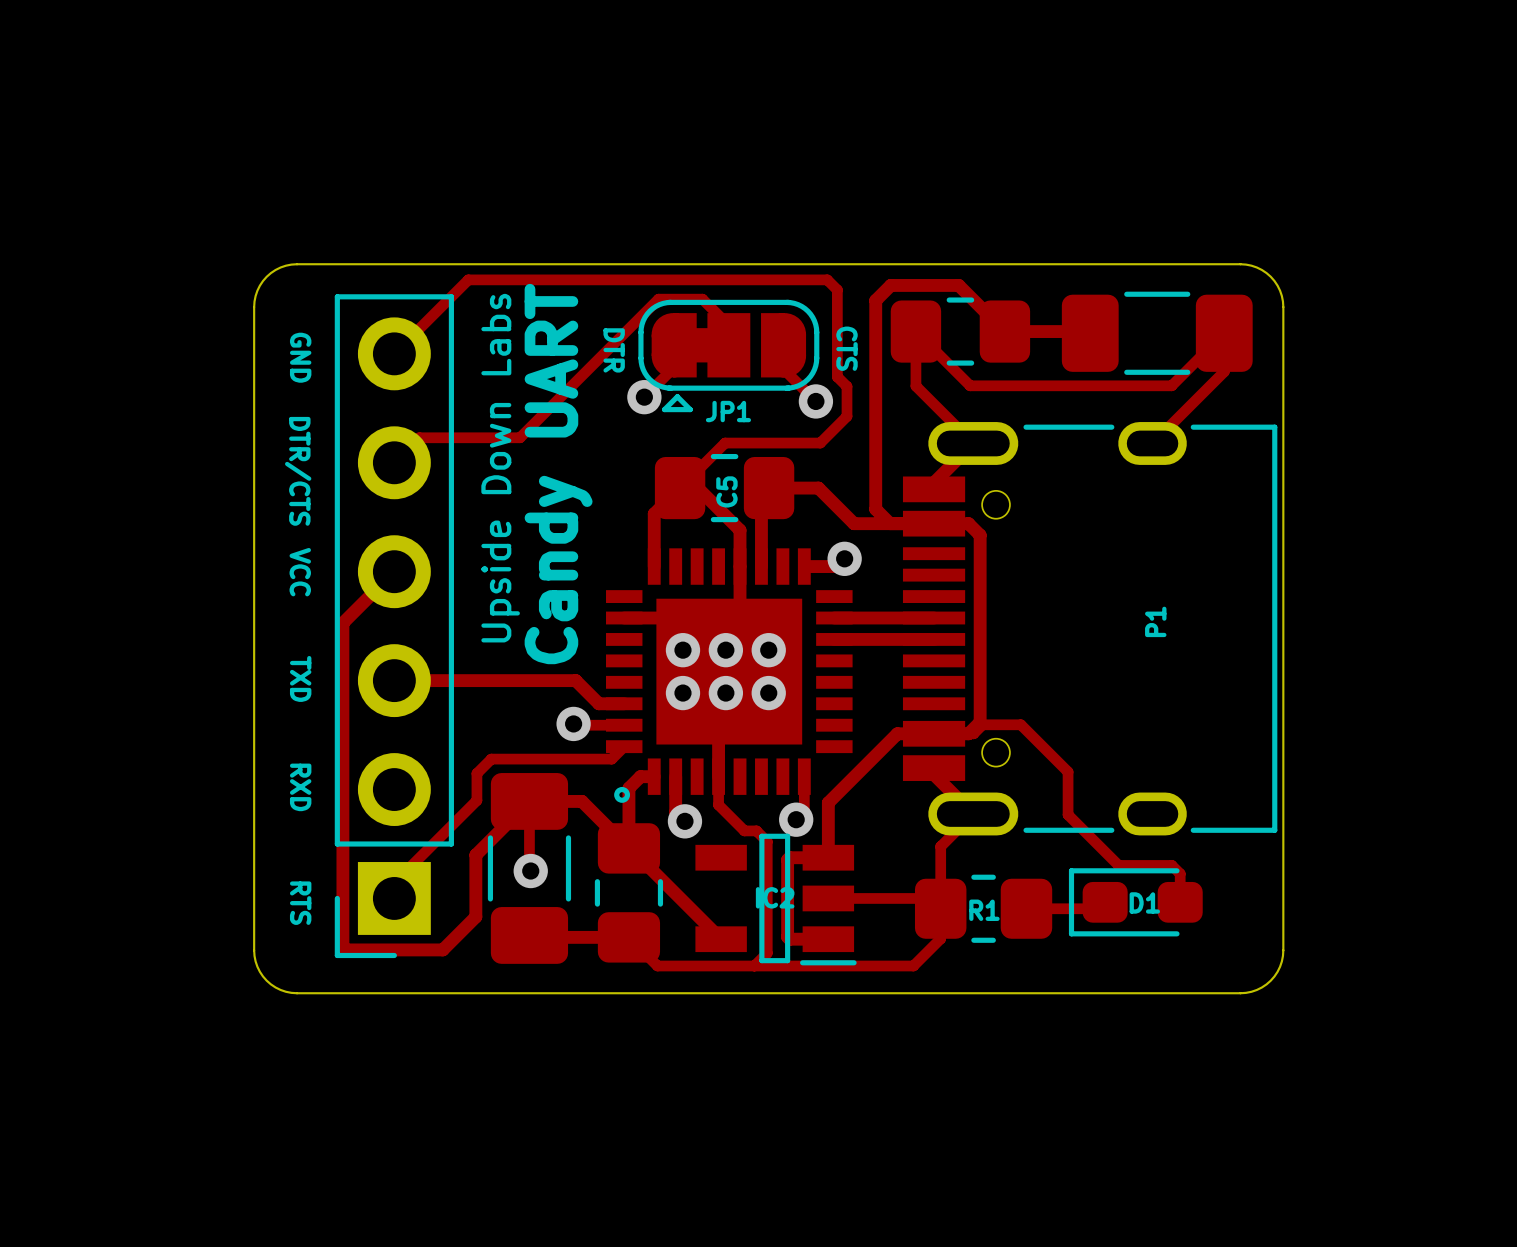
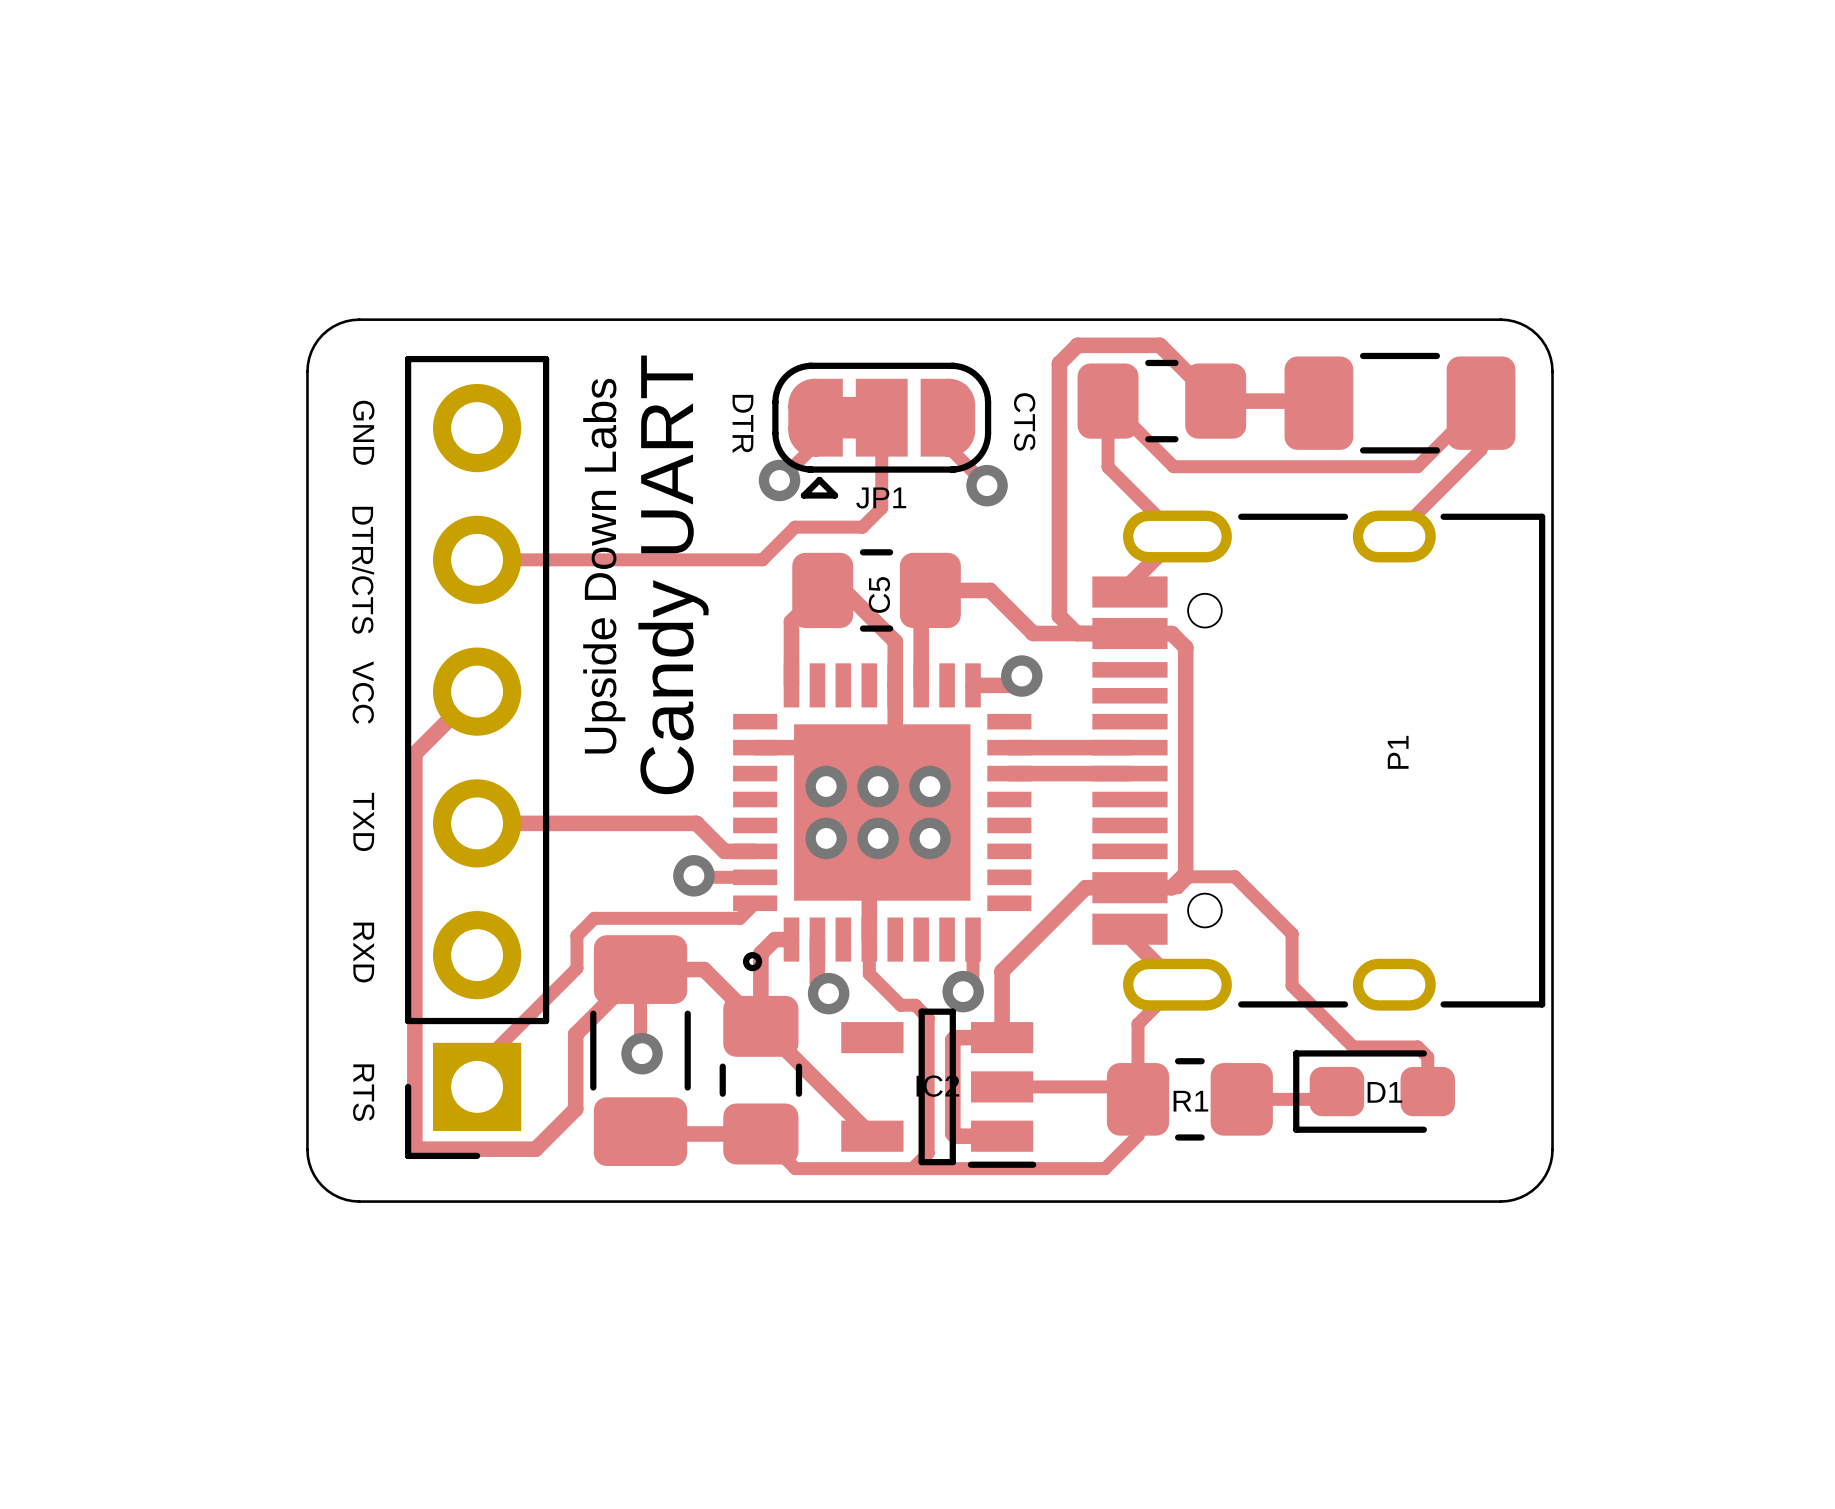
track: (728, 345) (728, 325) (702, 299) (658, 299) (520, 437) (419, 437) (394, 462) -> (881, 417) (881, 507) (862, 527) (795, 527) (762, 559) (477, 559)
track: (394, 353) (468, 279) (827, 279) (837, 289) (837, 376) (847, 386) (847, 416) (820, 443) (725, 443) (680, 488) -> none

